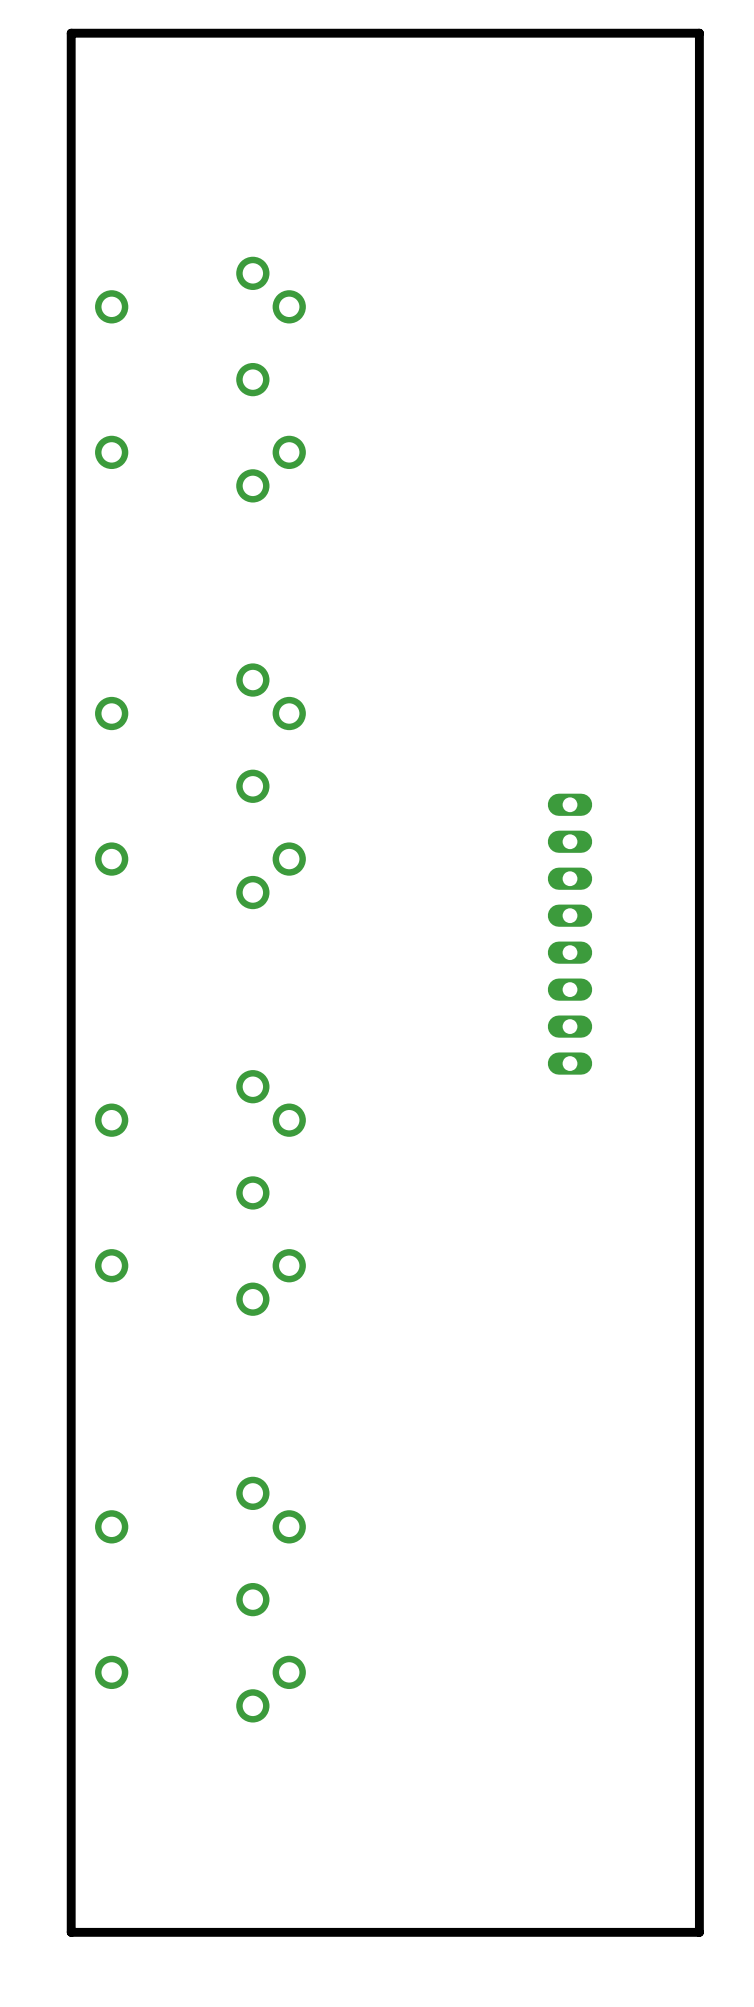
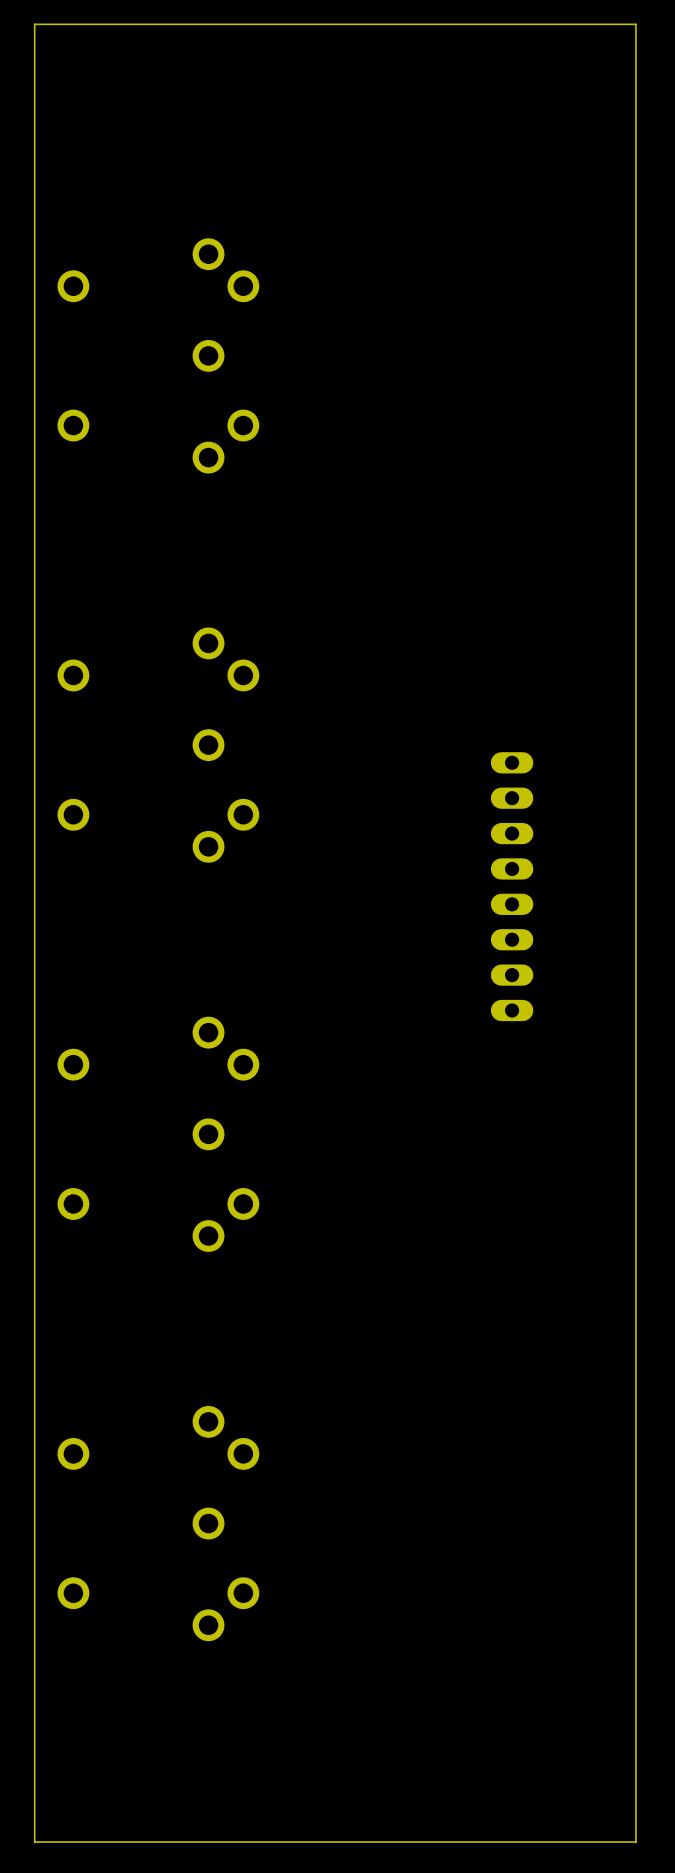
board edge width: thick (699, 33) (71, 33) (71, 1932) (699, 1932) (699, 33) -> thin (635, 24) (34, 24) (34, 1842) (635, 1842) (635, 24)

